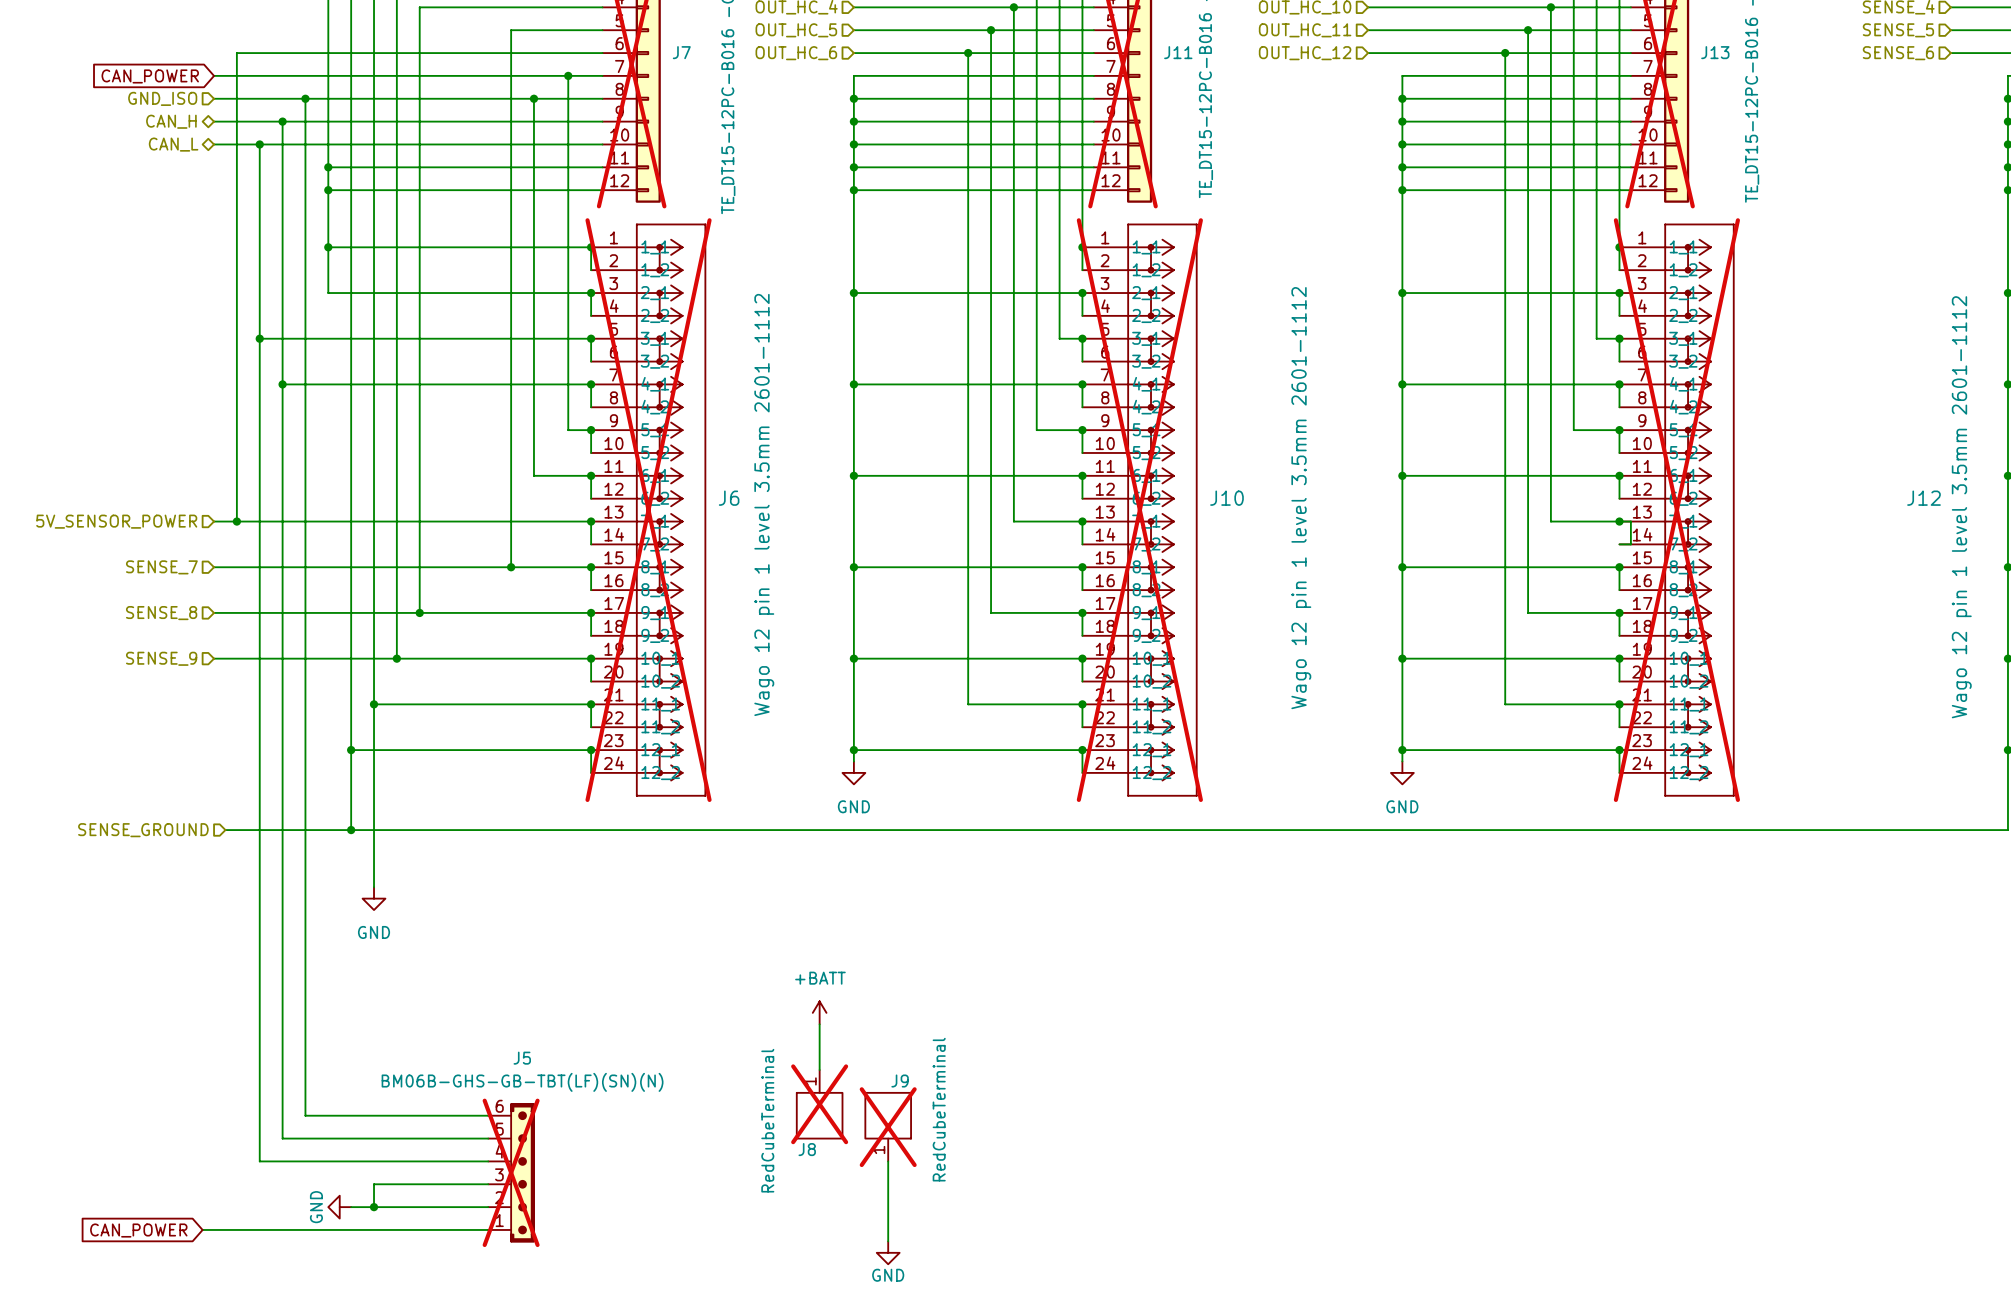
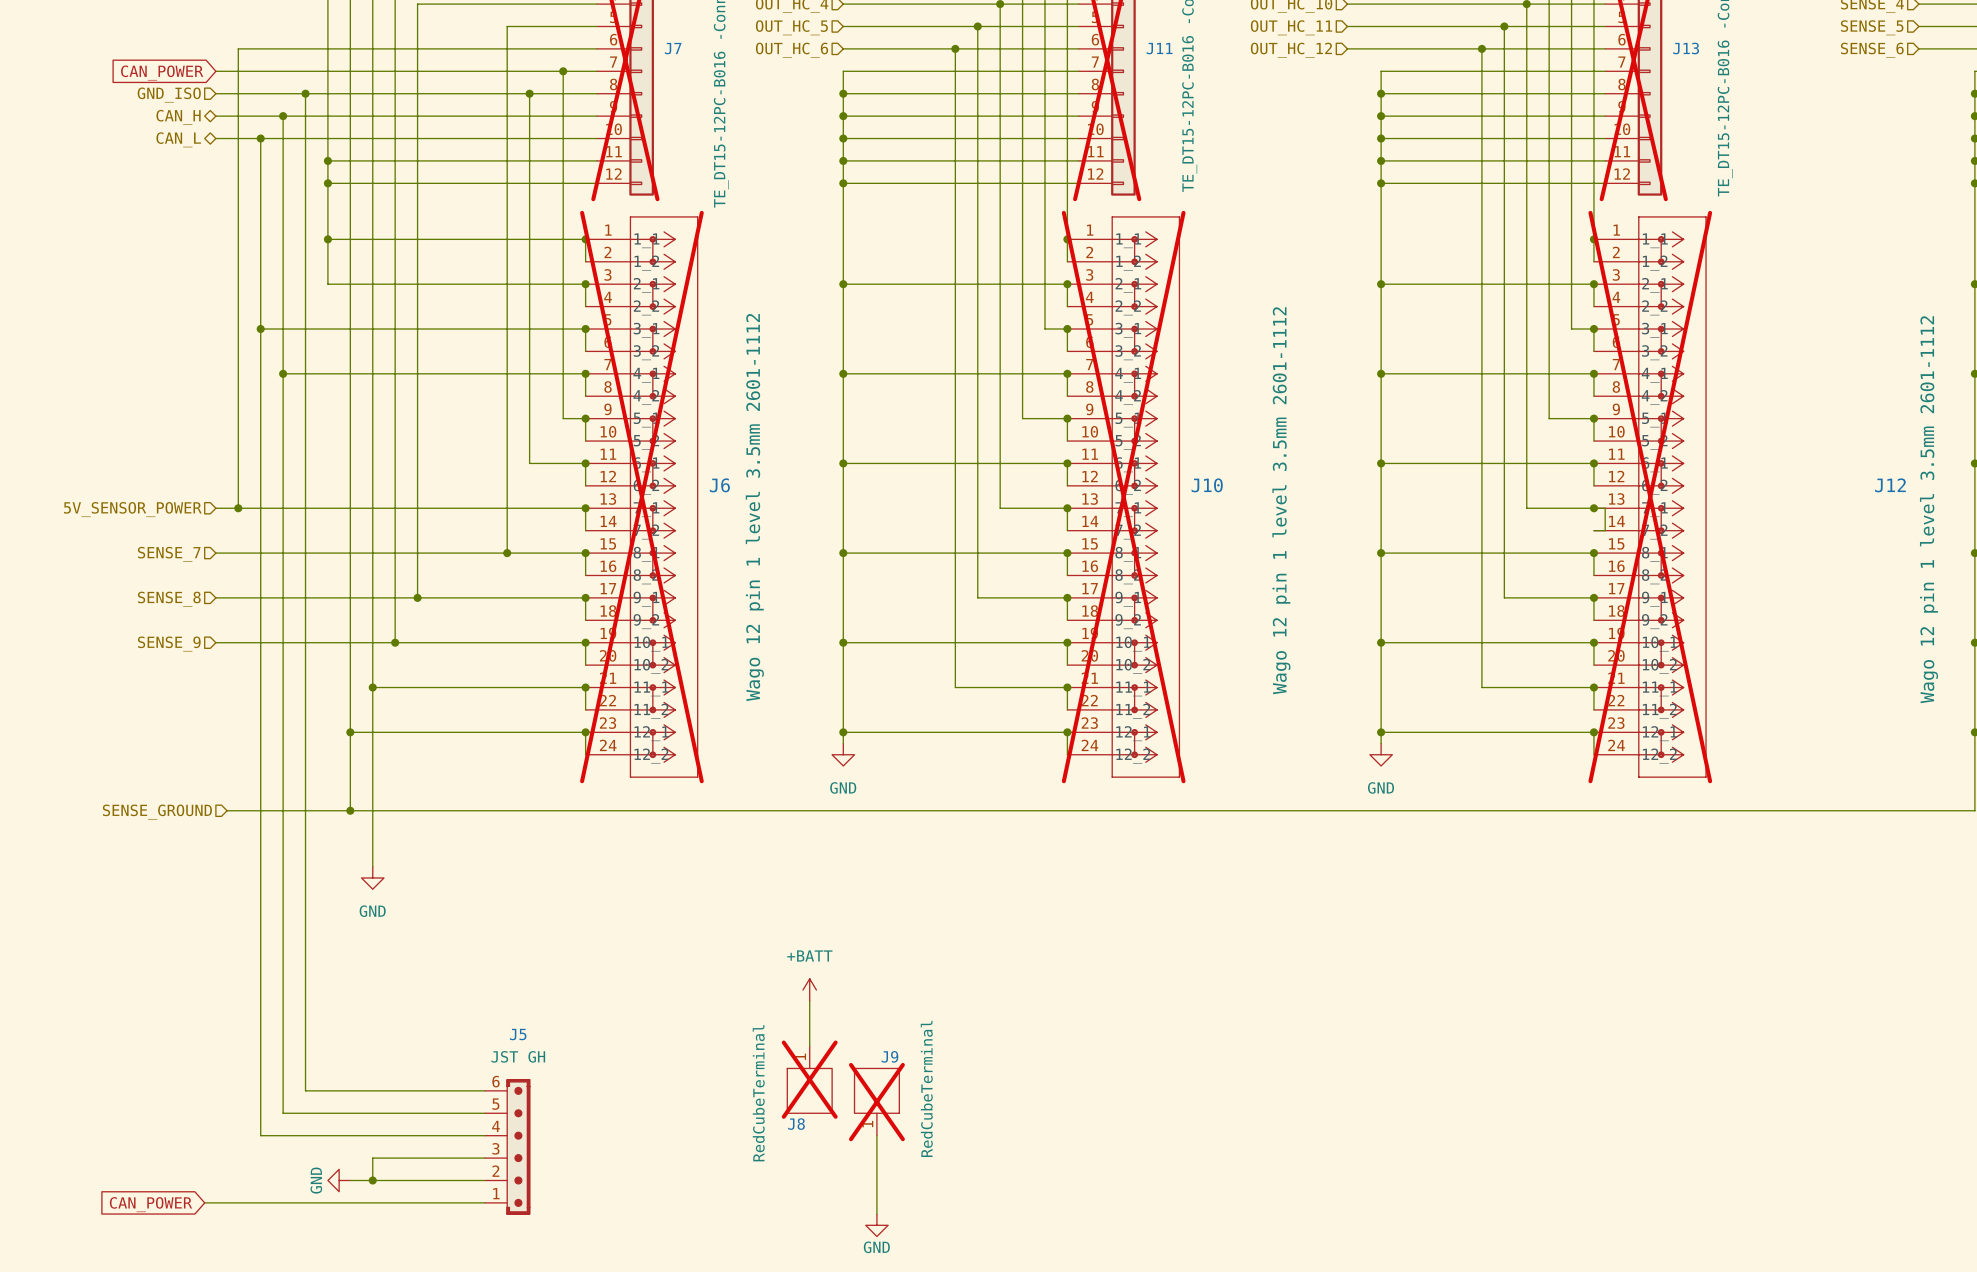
J5 value: BM06B-GHS-GB-TBT(LF)(SN)(N) (522, 1082) -> JST GH (518, 1056)
J5 do-not-place cross: (511, 1172) -> none

